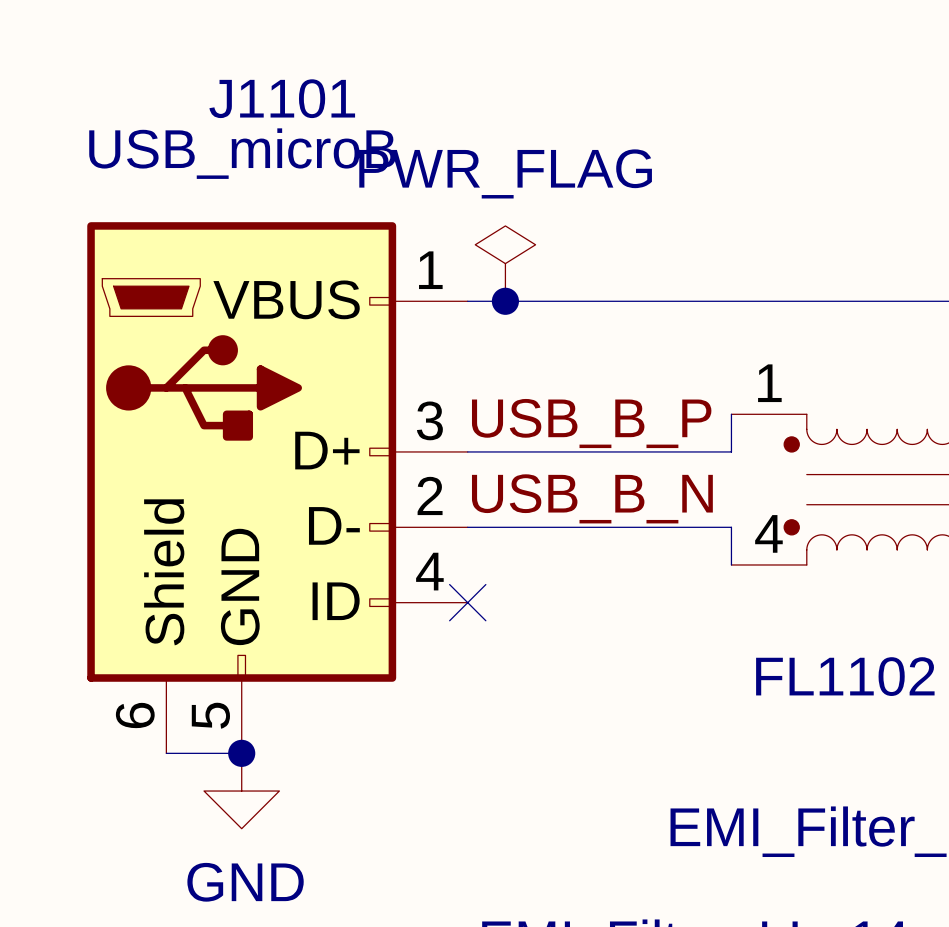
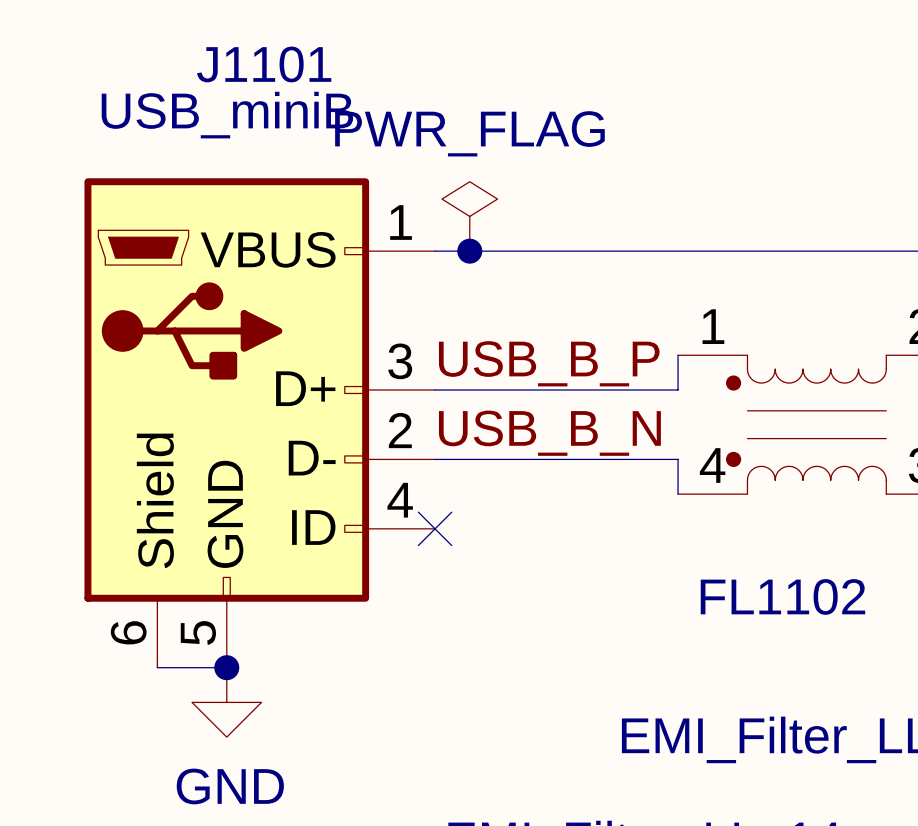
J1101 value: USB_microB (242, 153) -> USB_miniB (227, 115)

